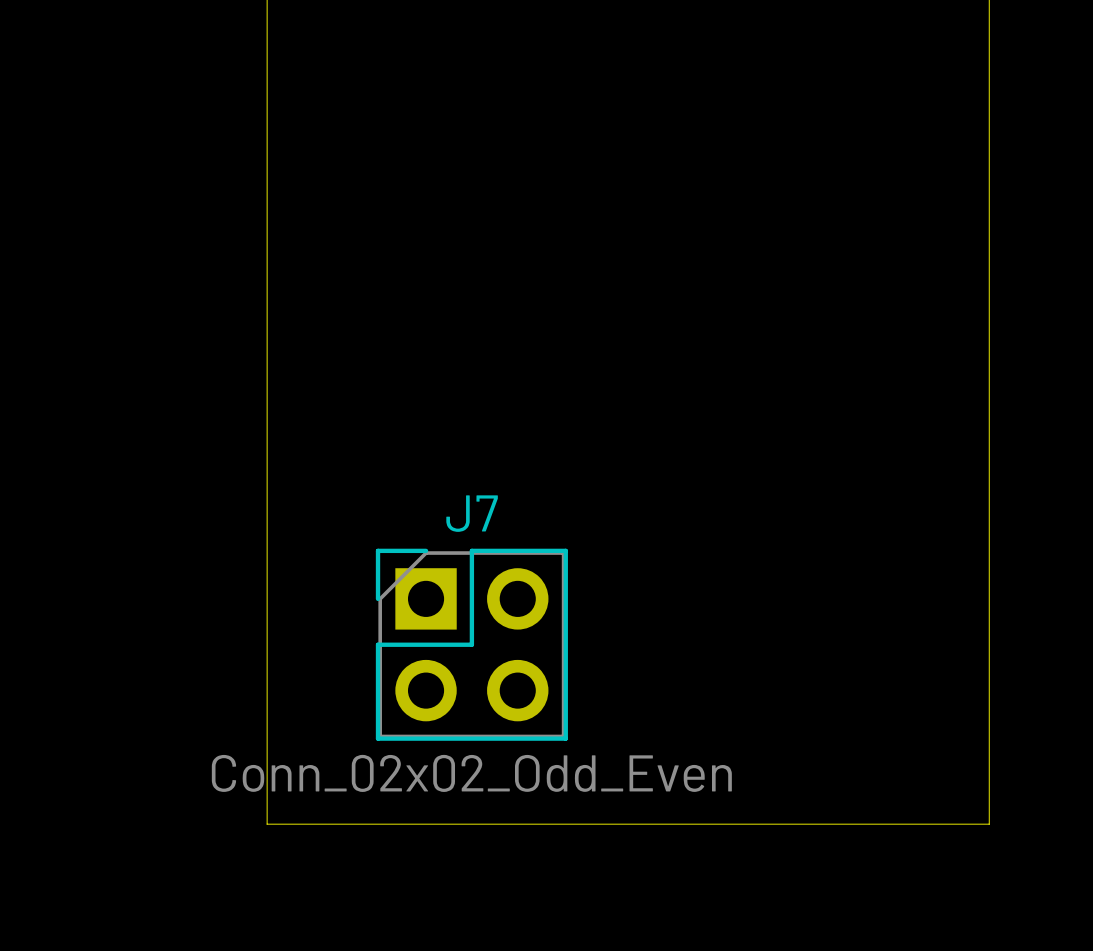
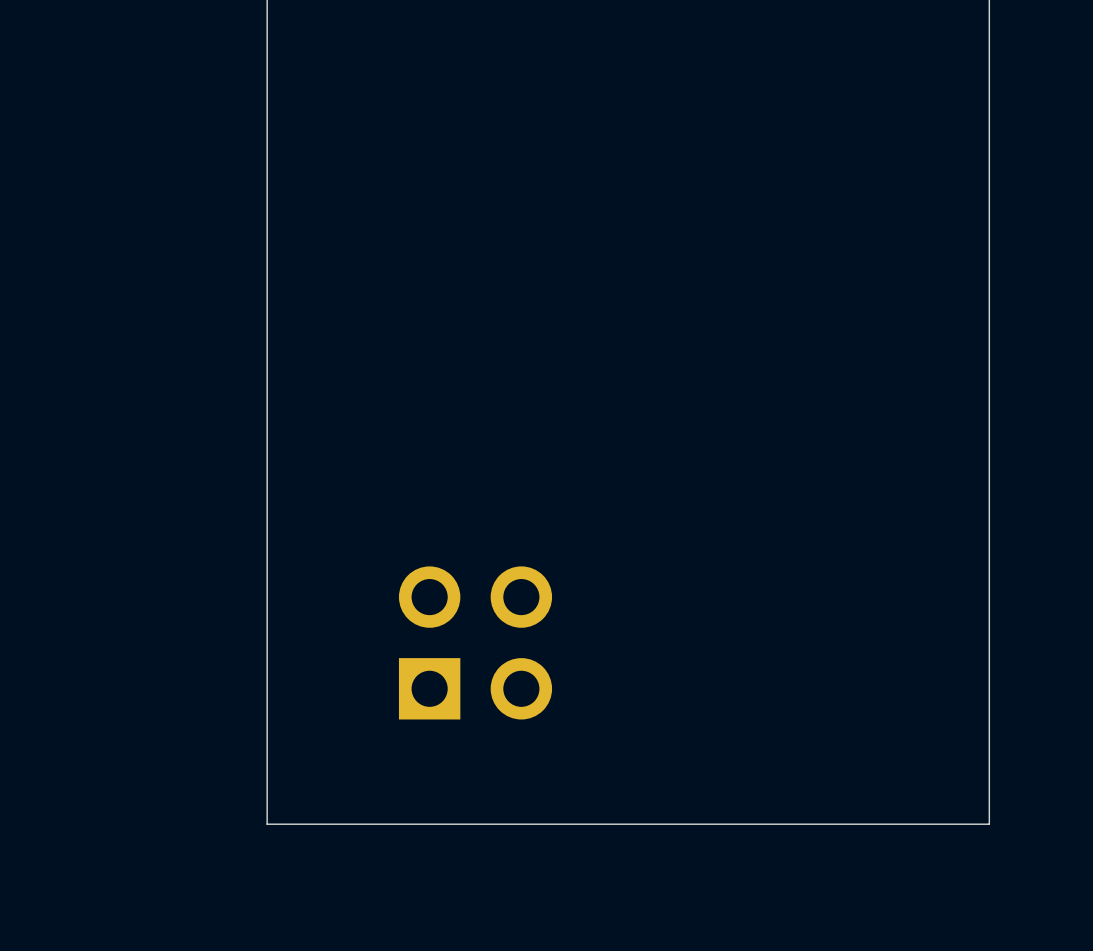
J7 side: top (471, 644) -> bottom (475, 642)

